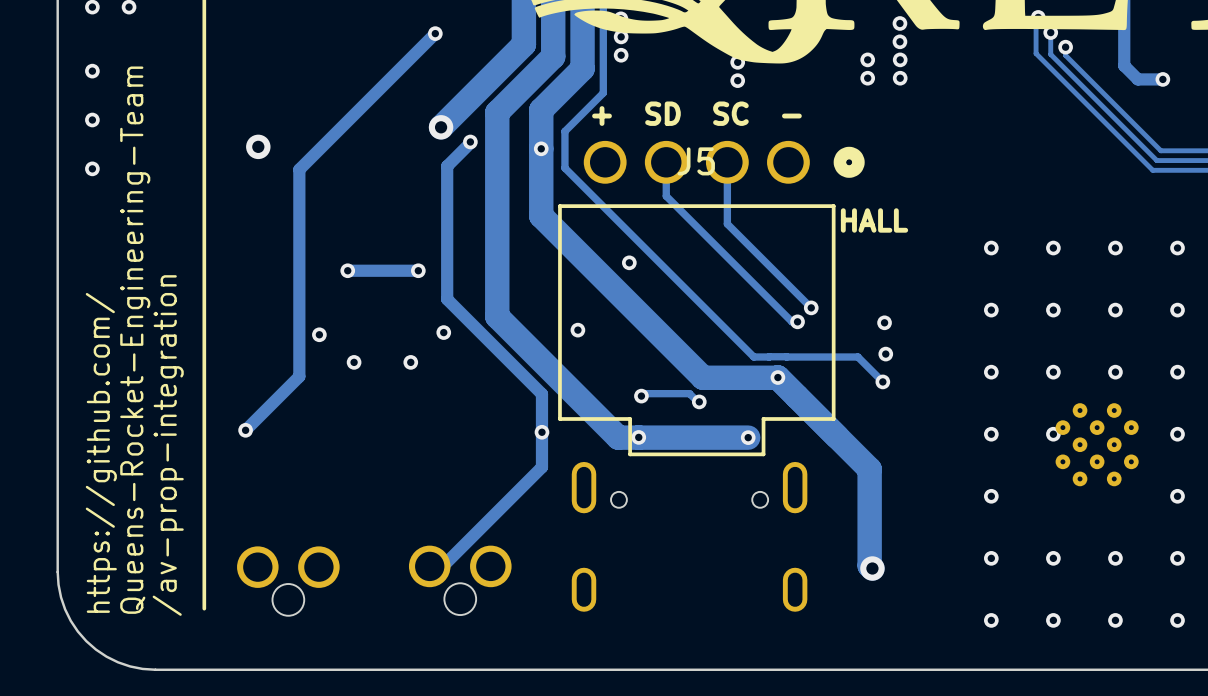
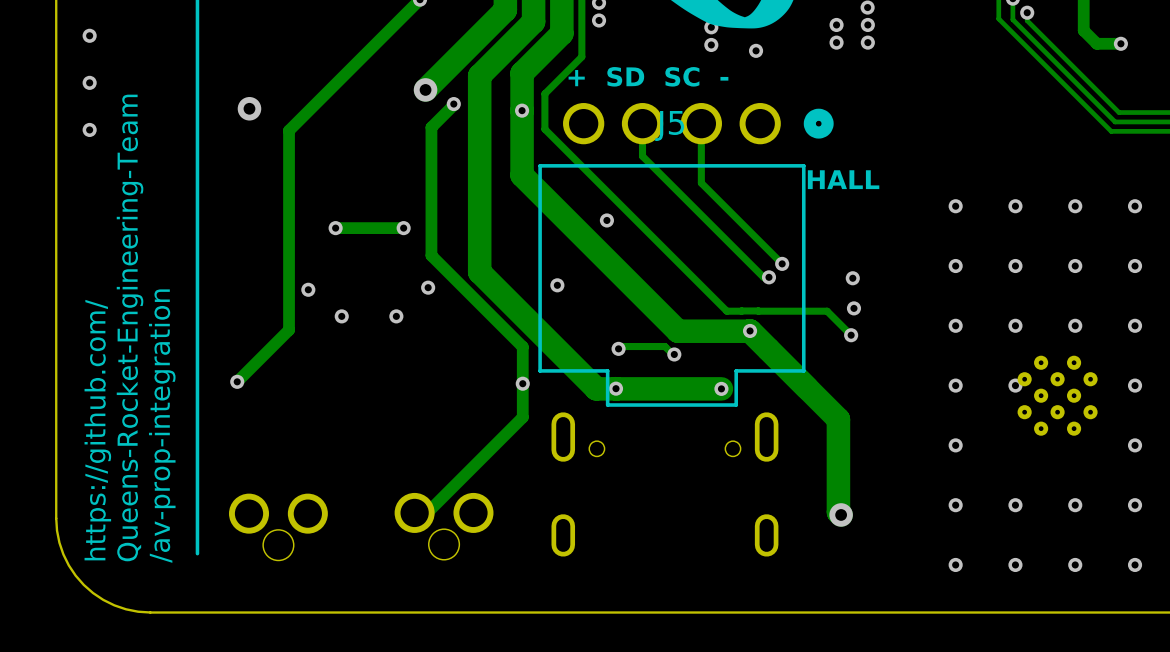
via: none -> (756, 50)

